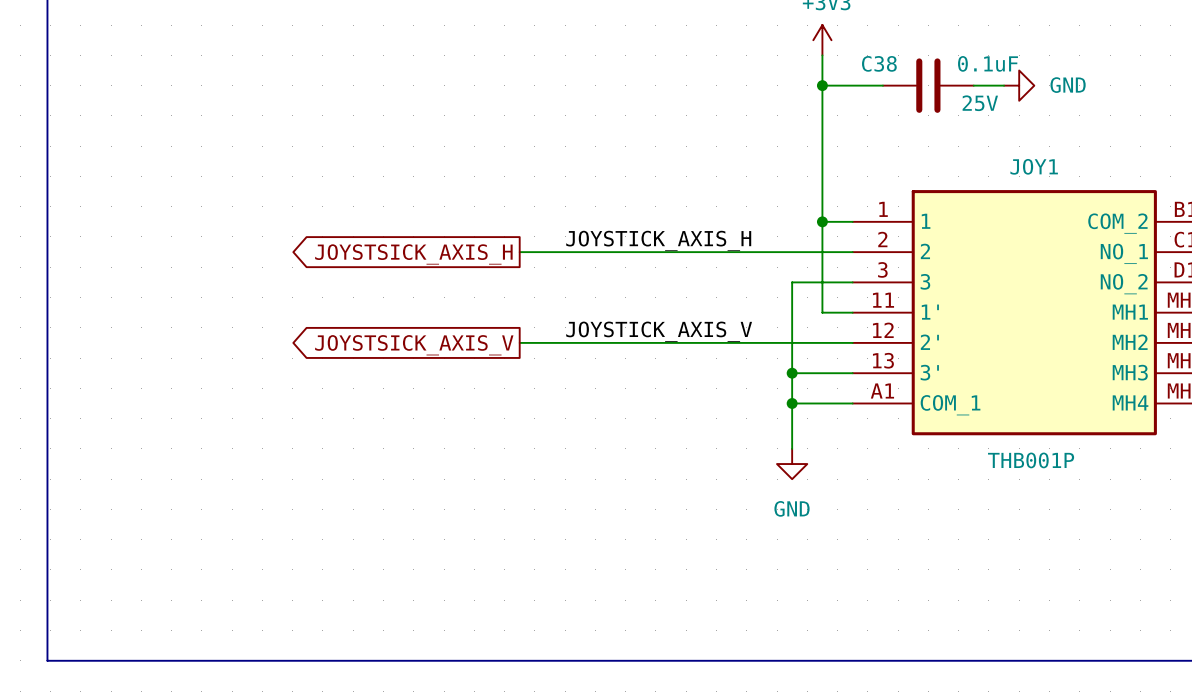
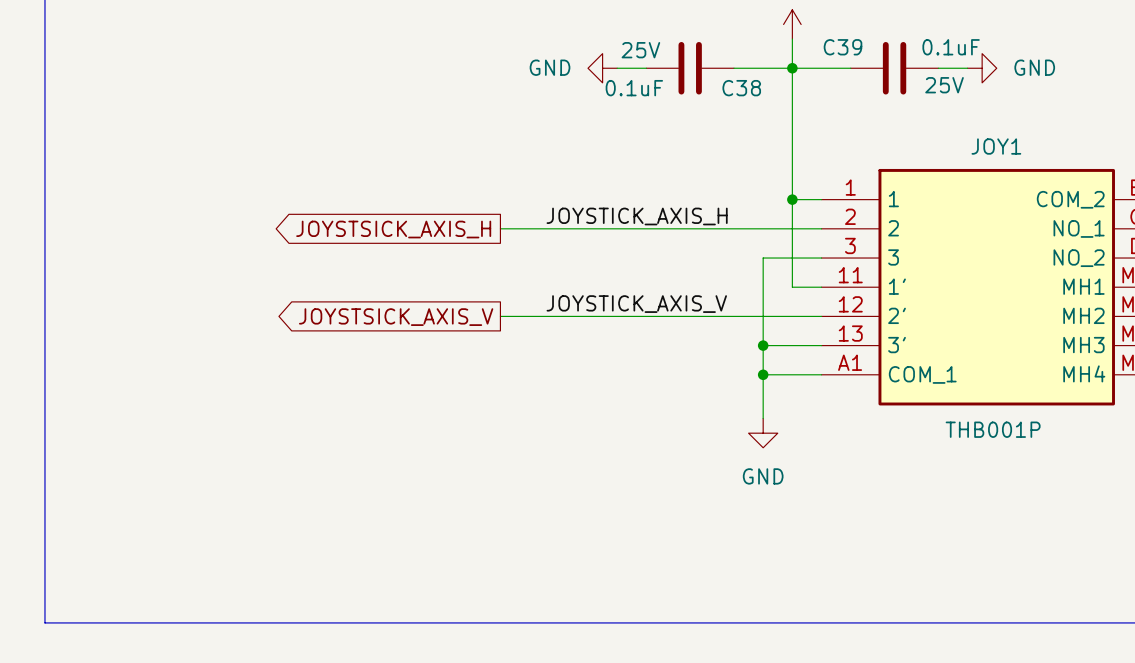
C38 name: C38 (879, 63) -> C39 (843, 47)
power symbol: none -> GND (602, 68)
wire: none -> (617, 68) (646, 68)
C38: none -> 0.1uF (690, 68)
wire: none -> (733, 68) (792, 68)

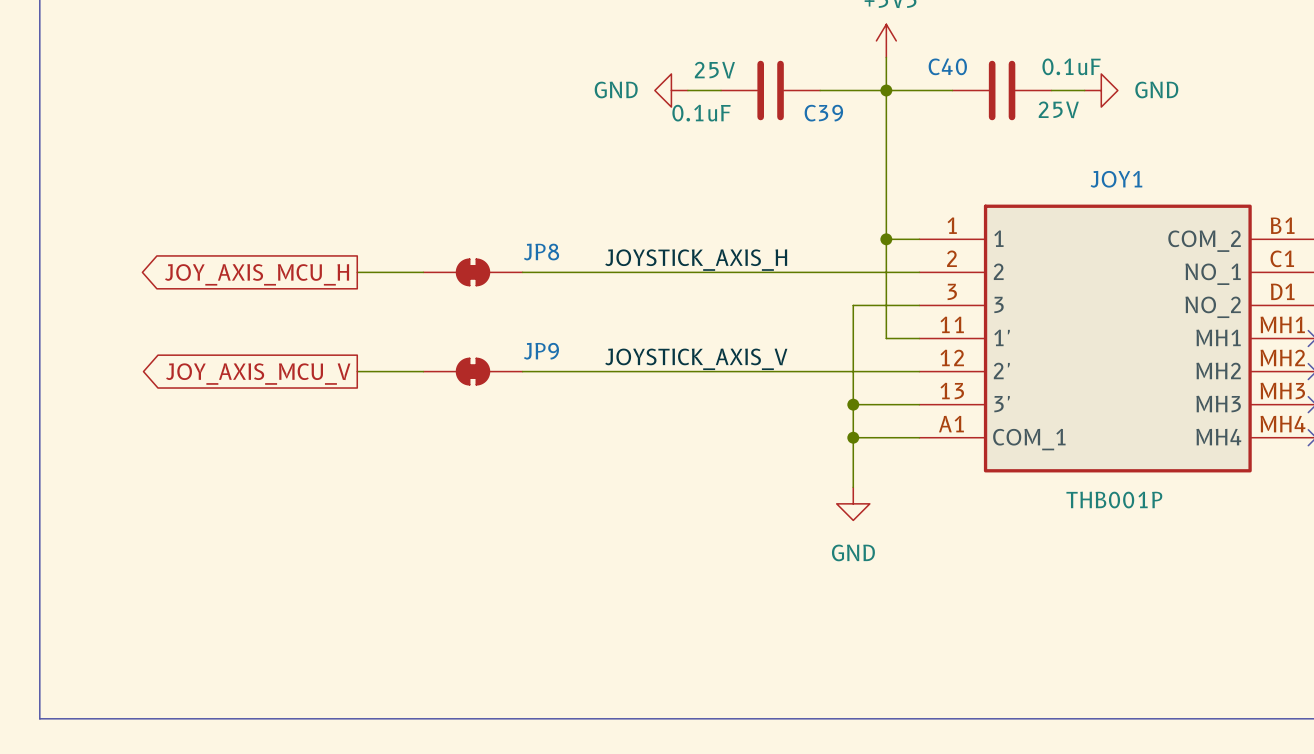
C39 name: C39 (843, 47) -> C40 (947, 66)
C38 name: C38 (741, 88) -> C39 (823, 113)
wire: none -> (357, 272) (423, 272)
JP8: none -> (472, 272)
wire: none -> (522, 272) (555, 272)
global label: JOYSTSICK_AXIS_H (393, 229) -> JOY_AXIS_MCU_H (257, 274)
wire: none -> (357, 371) (423, 371)
JP9: none -> (472, 371)
wire: none -> (522, 371) (555, 371)
global label: JOYSTSICK_AXIS_V (396, 317) -> JOY_AXIS_MCU_V (258, 374)

